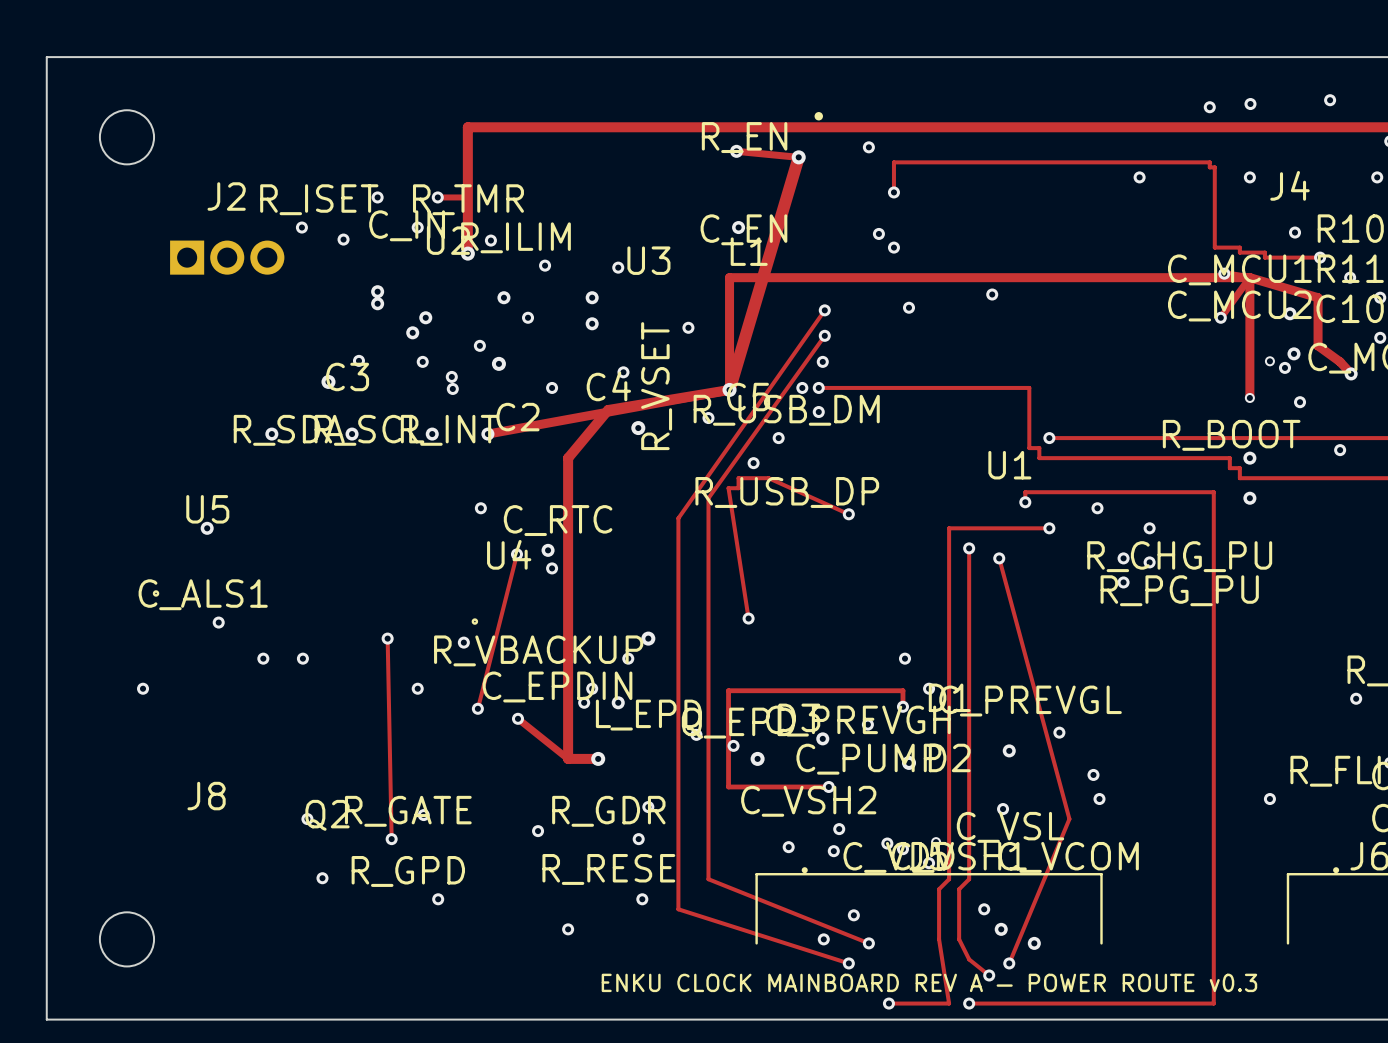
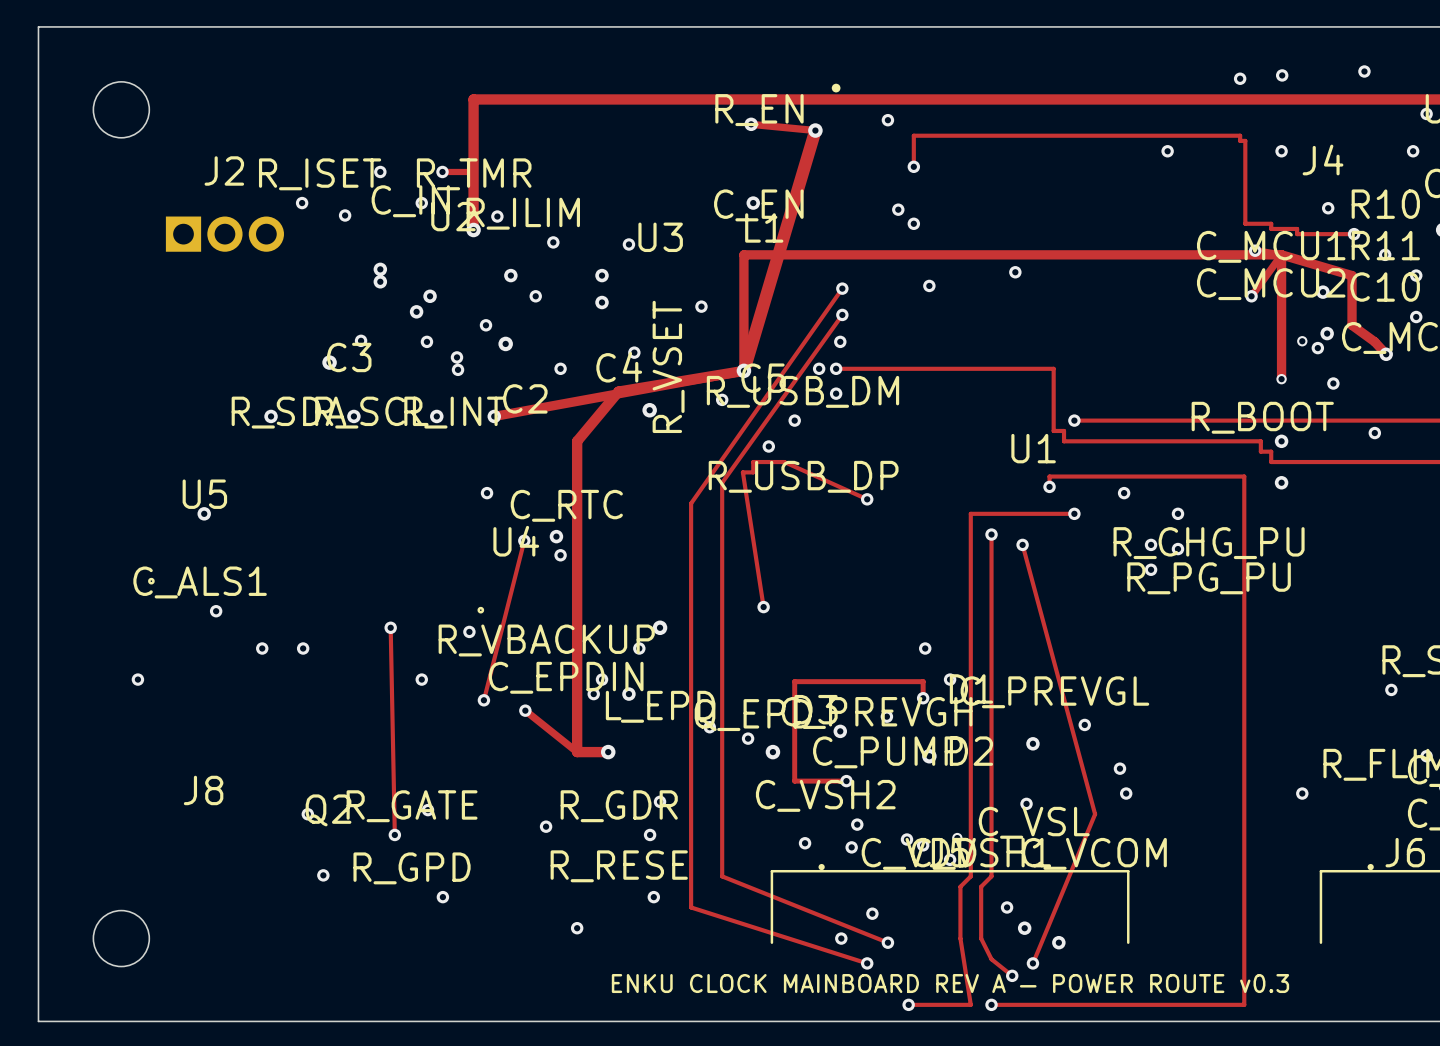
track: (778, 690) (728, 690) (728, 786) (778, 786) -> (794, 681) (794, 781)

